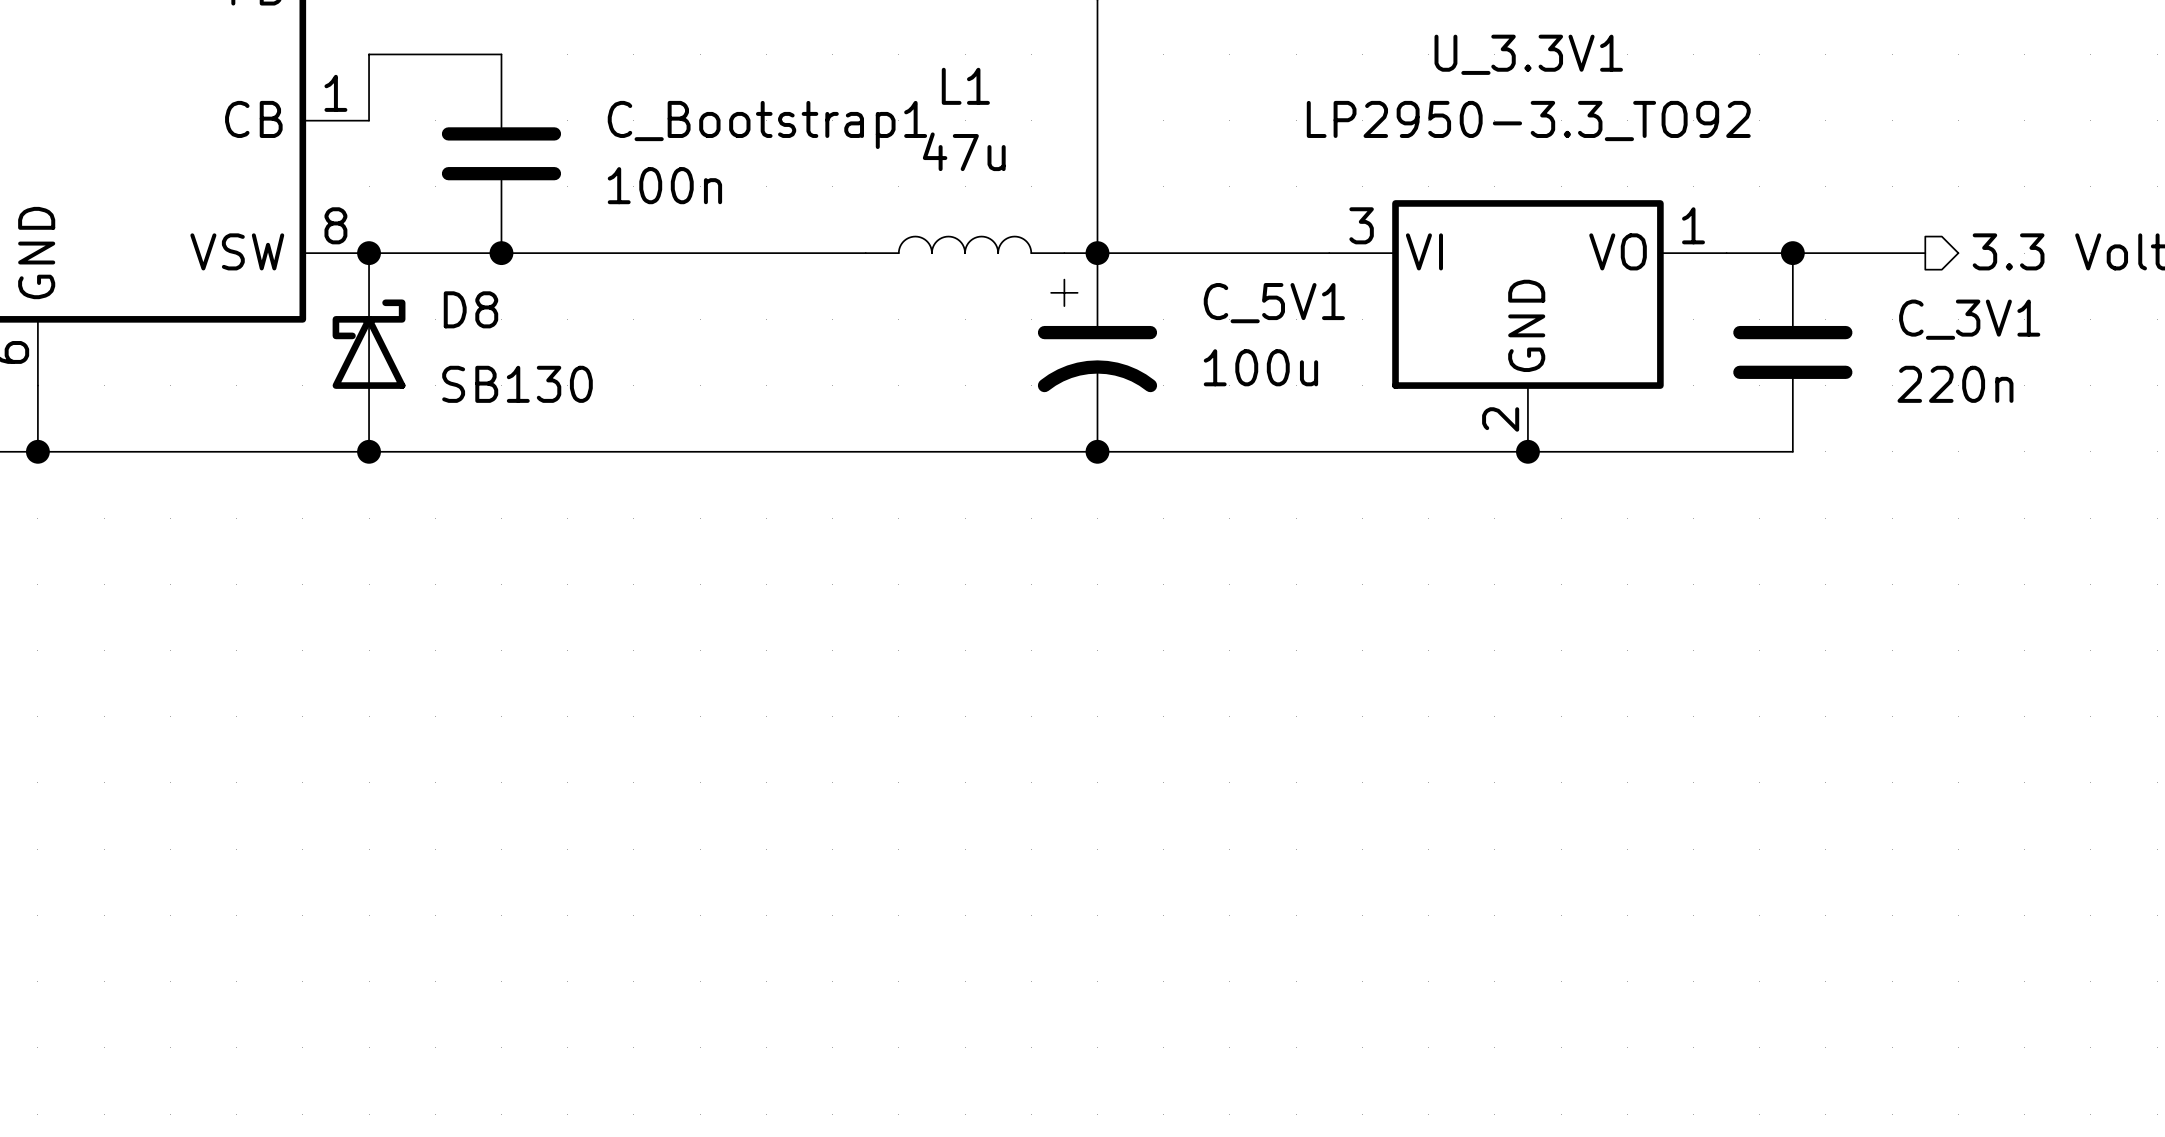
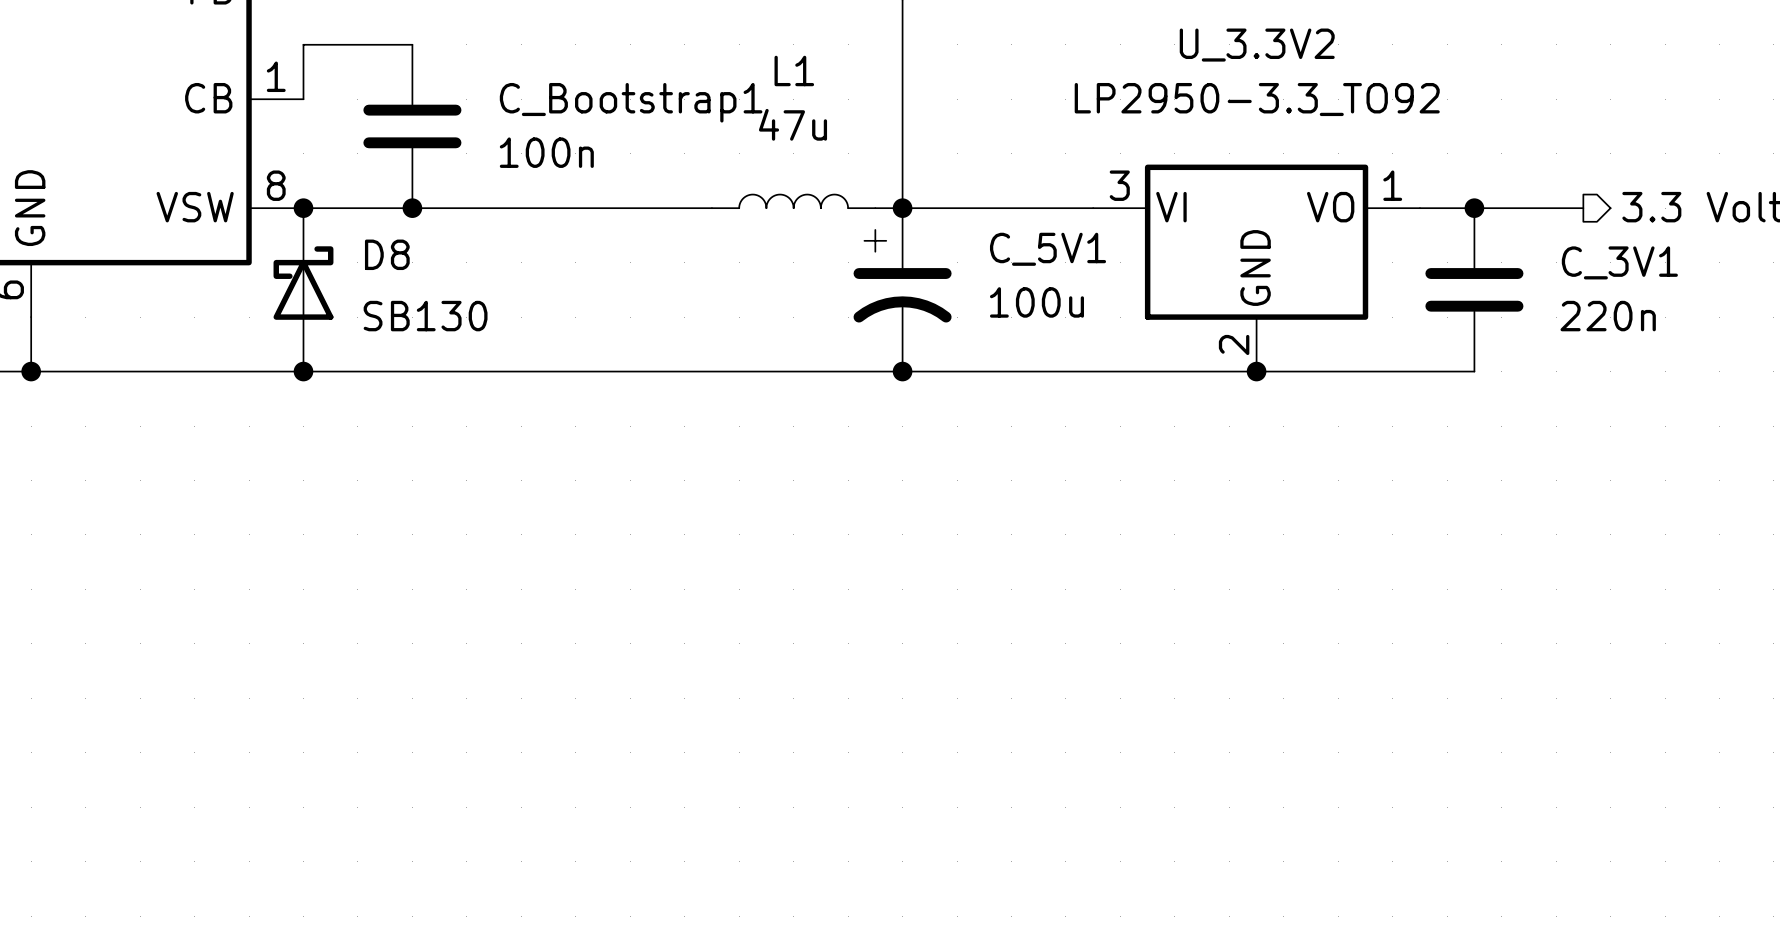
U_3.3V1 name: U_3.3V1 (1528, 54) -> U_3.3V2 (1257, 45)

